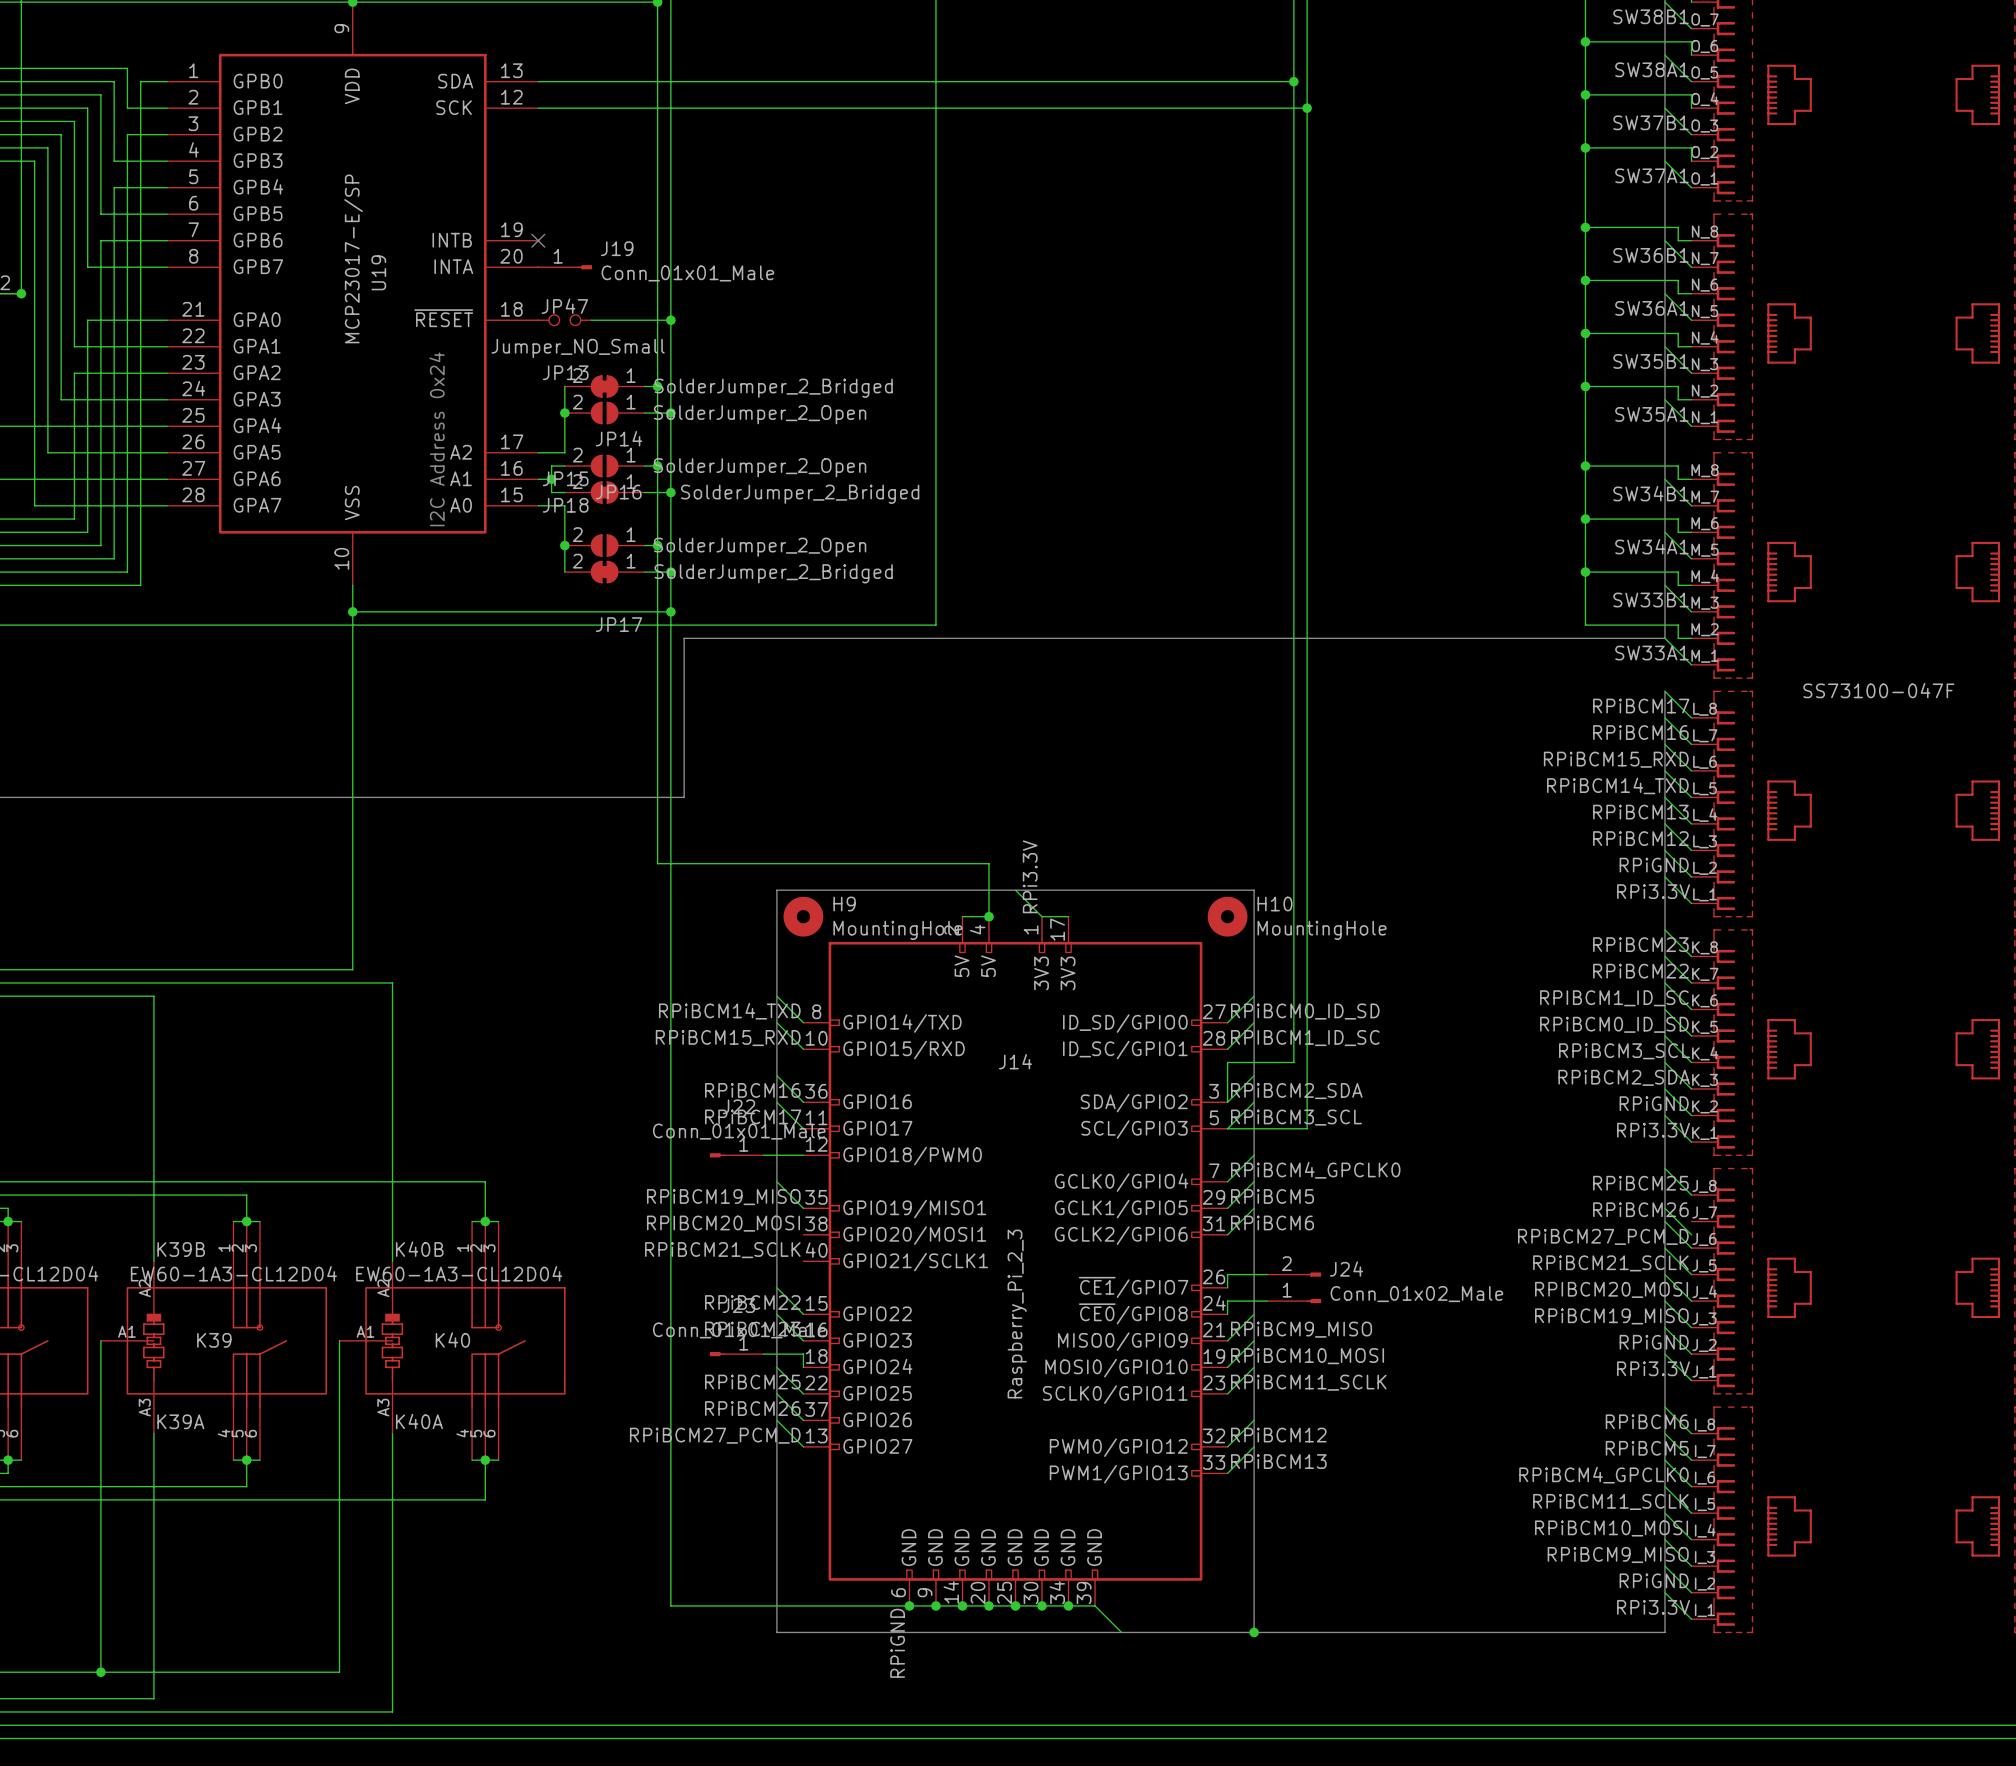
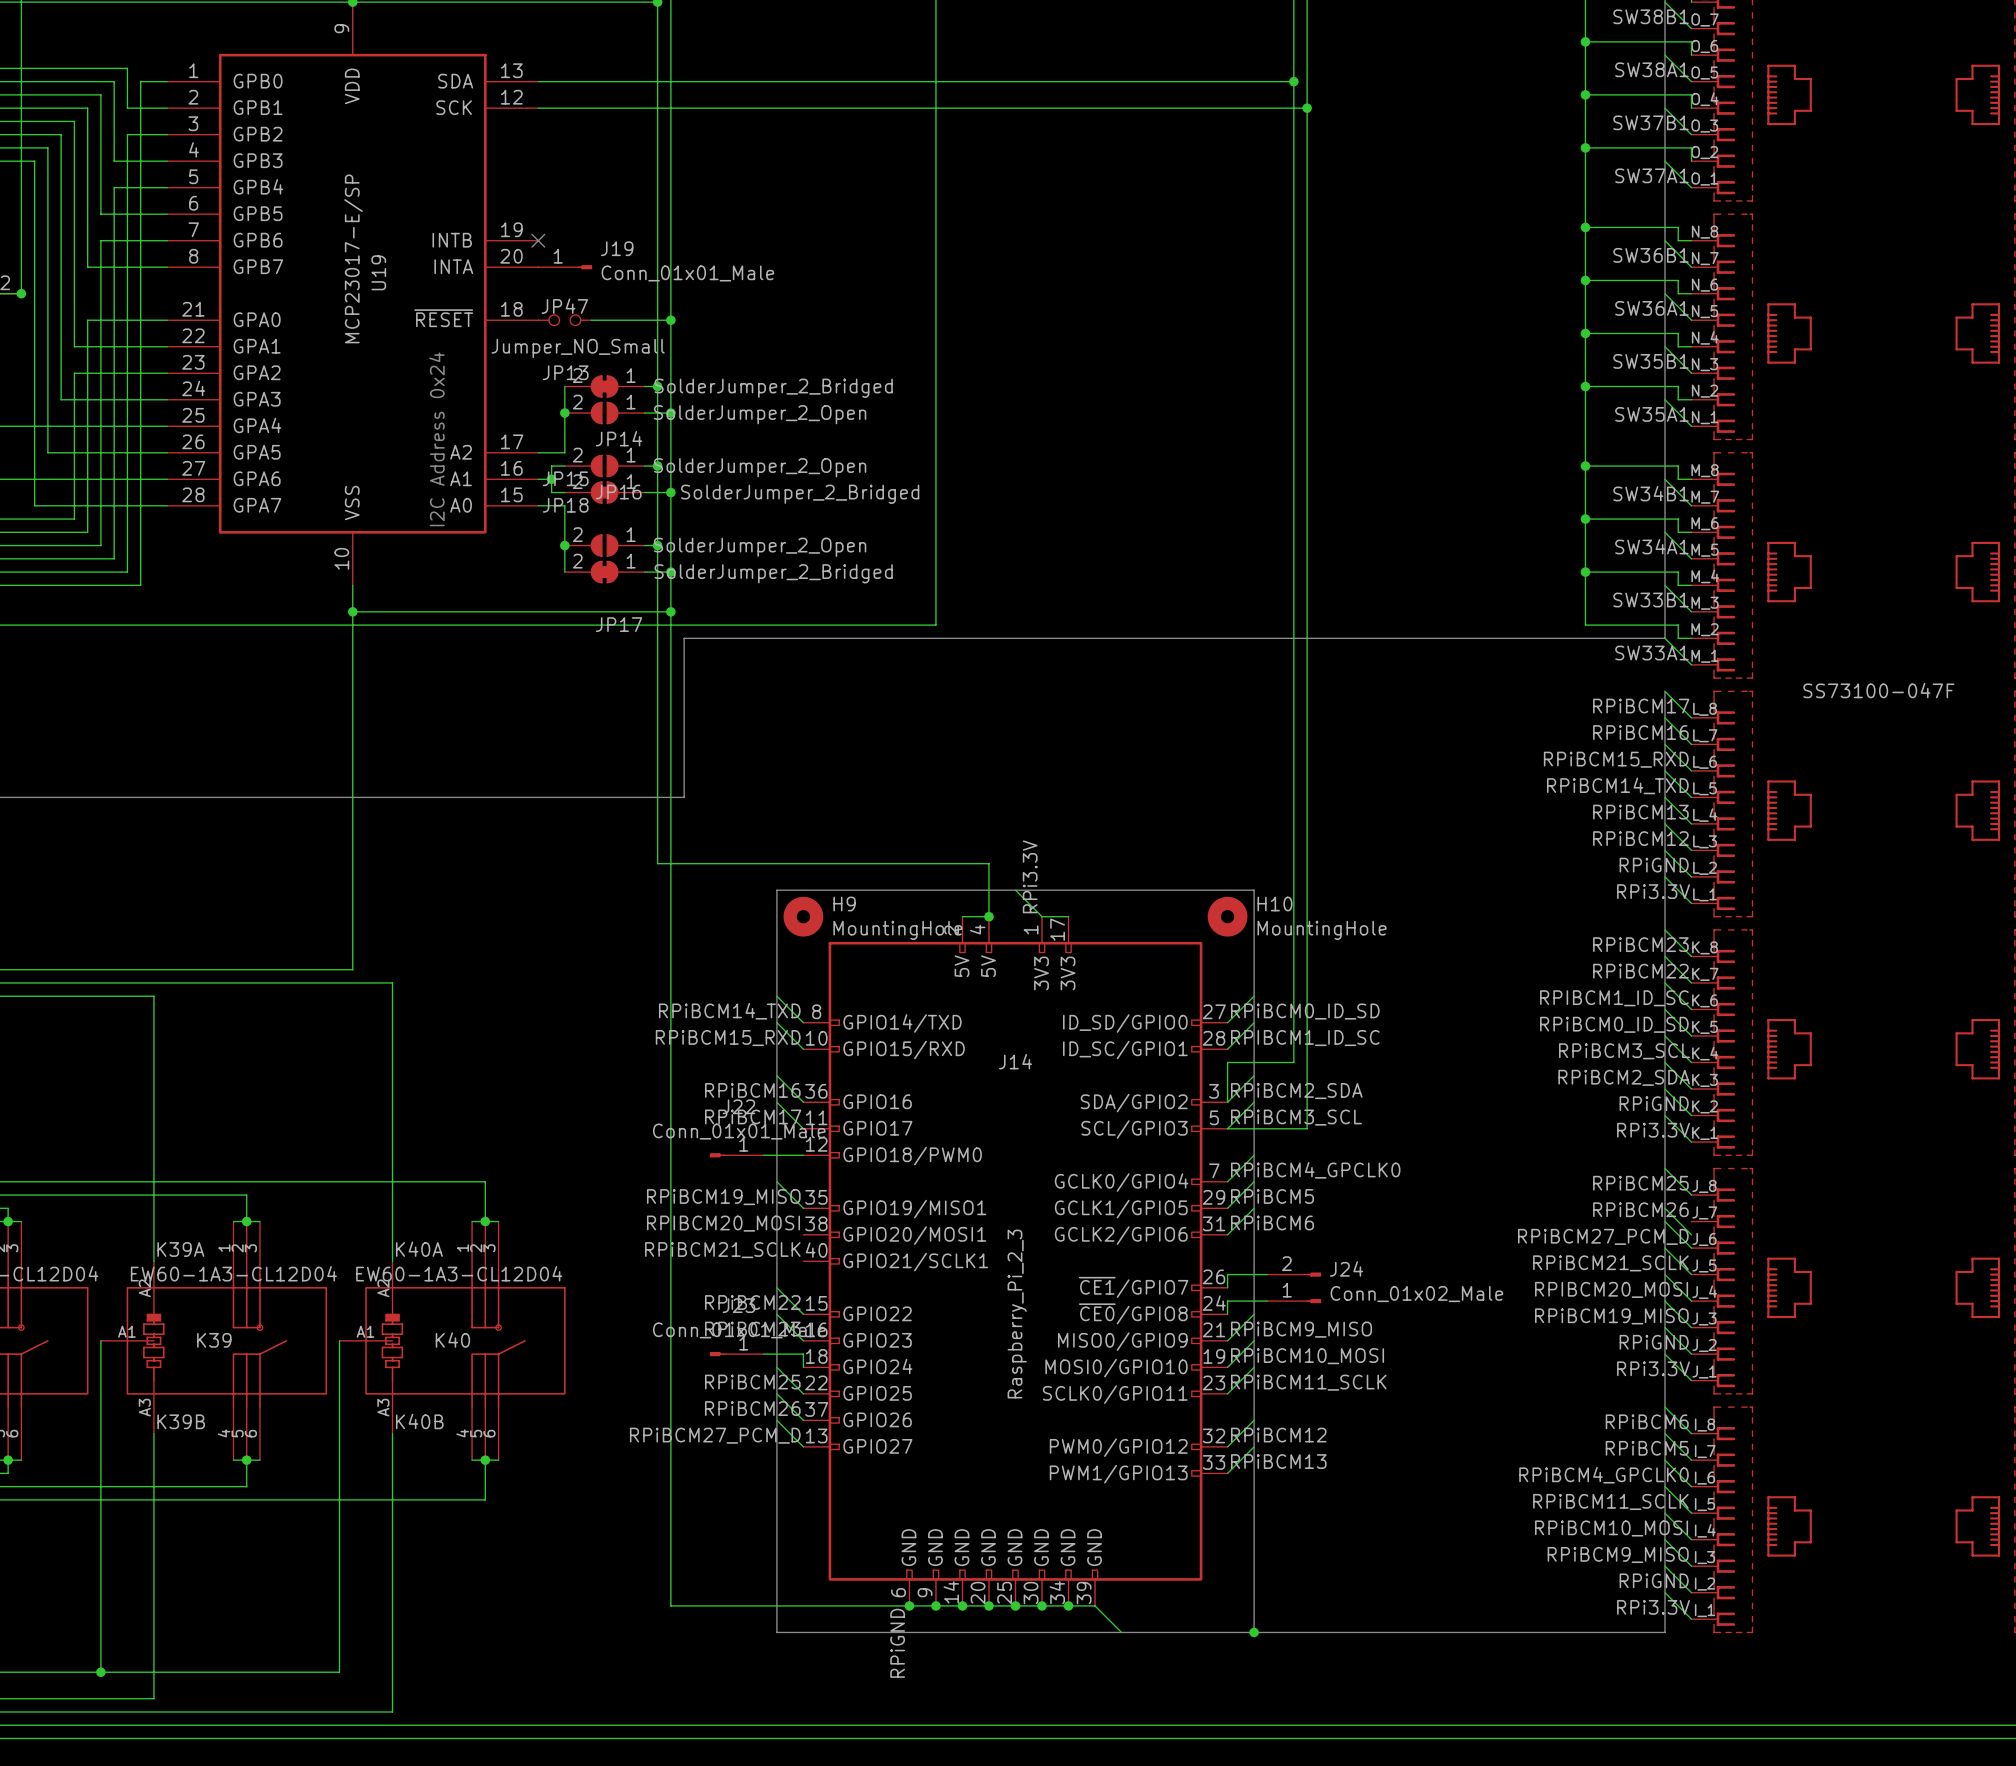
label: K39B (181, 1249) -> K39A (180, 1249)
label: K40B (419, 1249) -> K40A (419, 1249)
label: K39A (180, 1421) -> K39B (181, 1421)
label: K40A (419, 1421) -> K40B (419, 1421)

